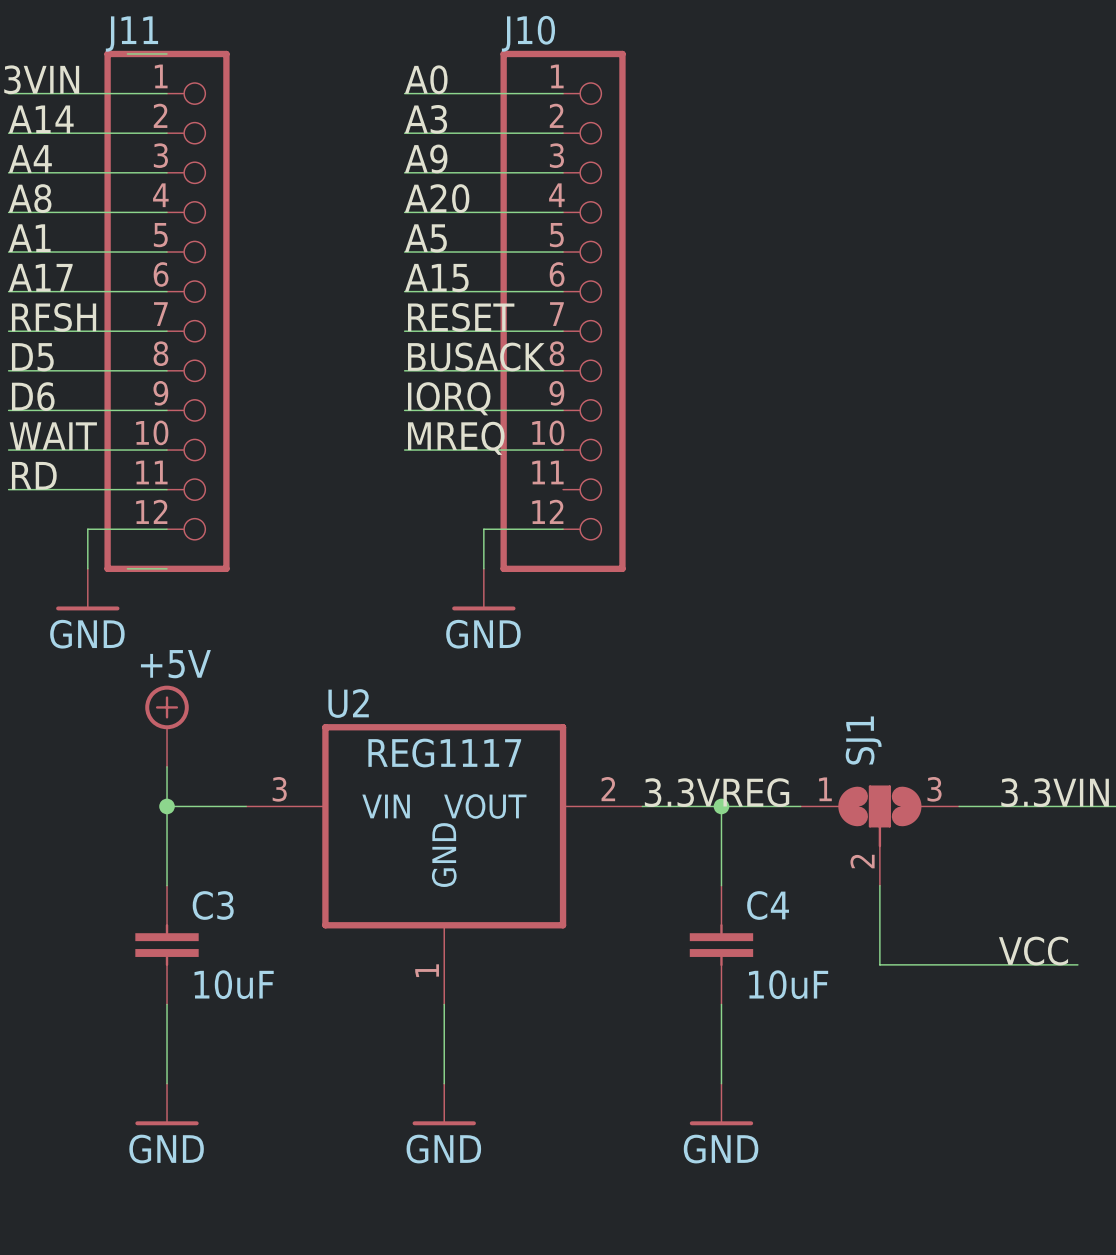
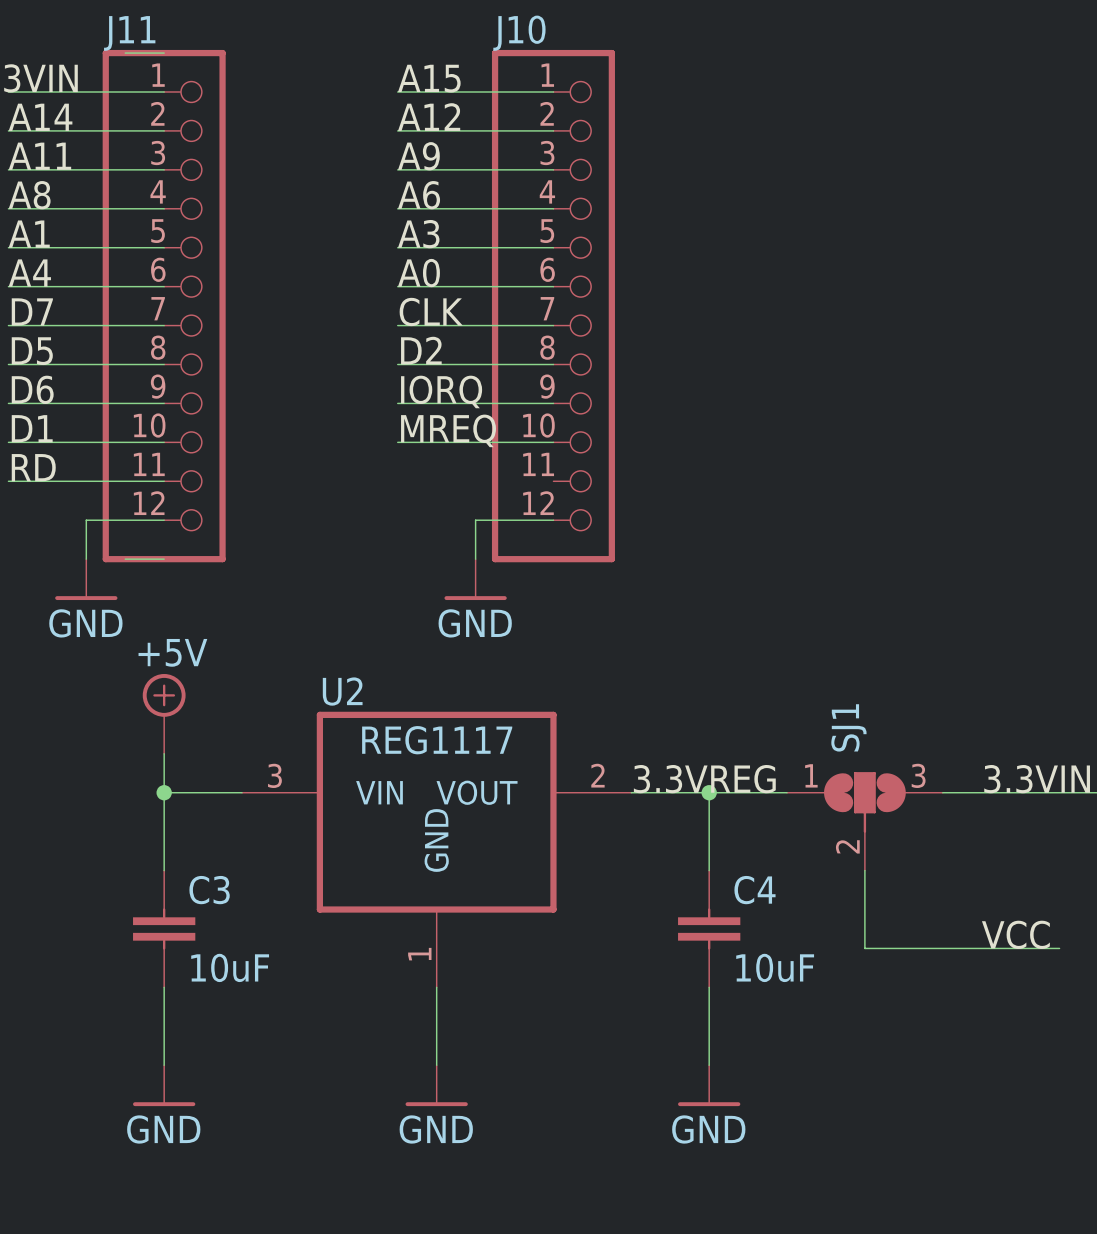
label: A0 (426, 79) -> A15 (429, 78)
label: A3 (425, 119) -> A12 (429, 117)
label: A4 (30, 158) -> A11 (39, 156)
label: A20 (437, 198) -> A6 (419, 195)
label: A5 (425, 238) -> A3 (418, 234)
label: A17 (40, 277) -> A4 (29, 273)
label: A15 (436, 278) -> A0 (418, 273)
label: RFSH (54, 317) -> D7 (32, 311)
label: RESET (461, 317) -> CLK (431, 311)
label: BUSACK (476, 356) -> D2 (421, 350)
label: WAIT (53, 436) -> D1 (32, 428)

